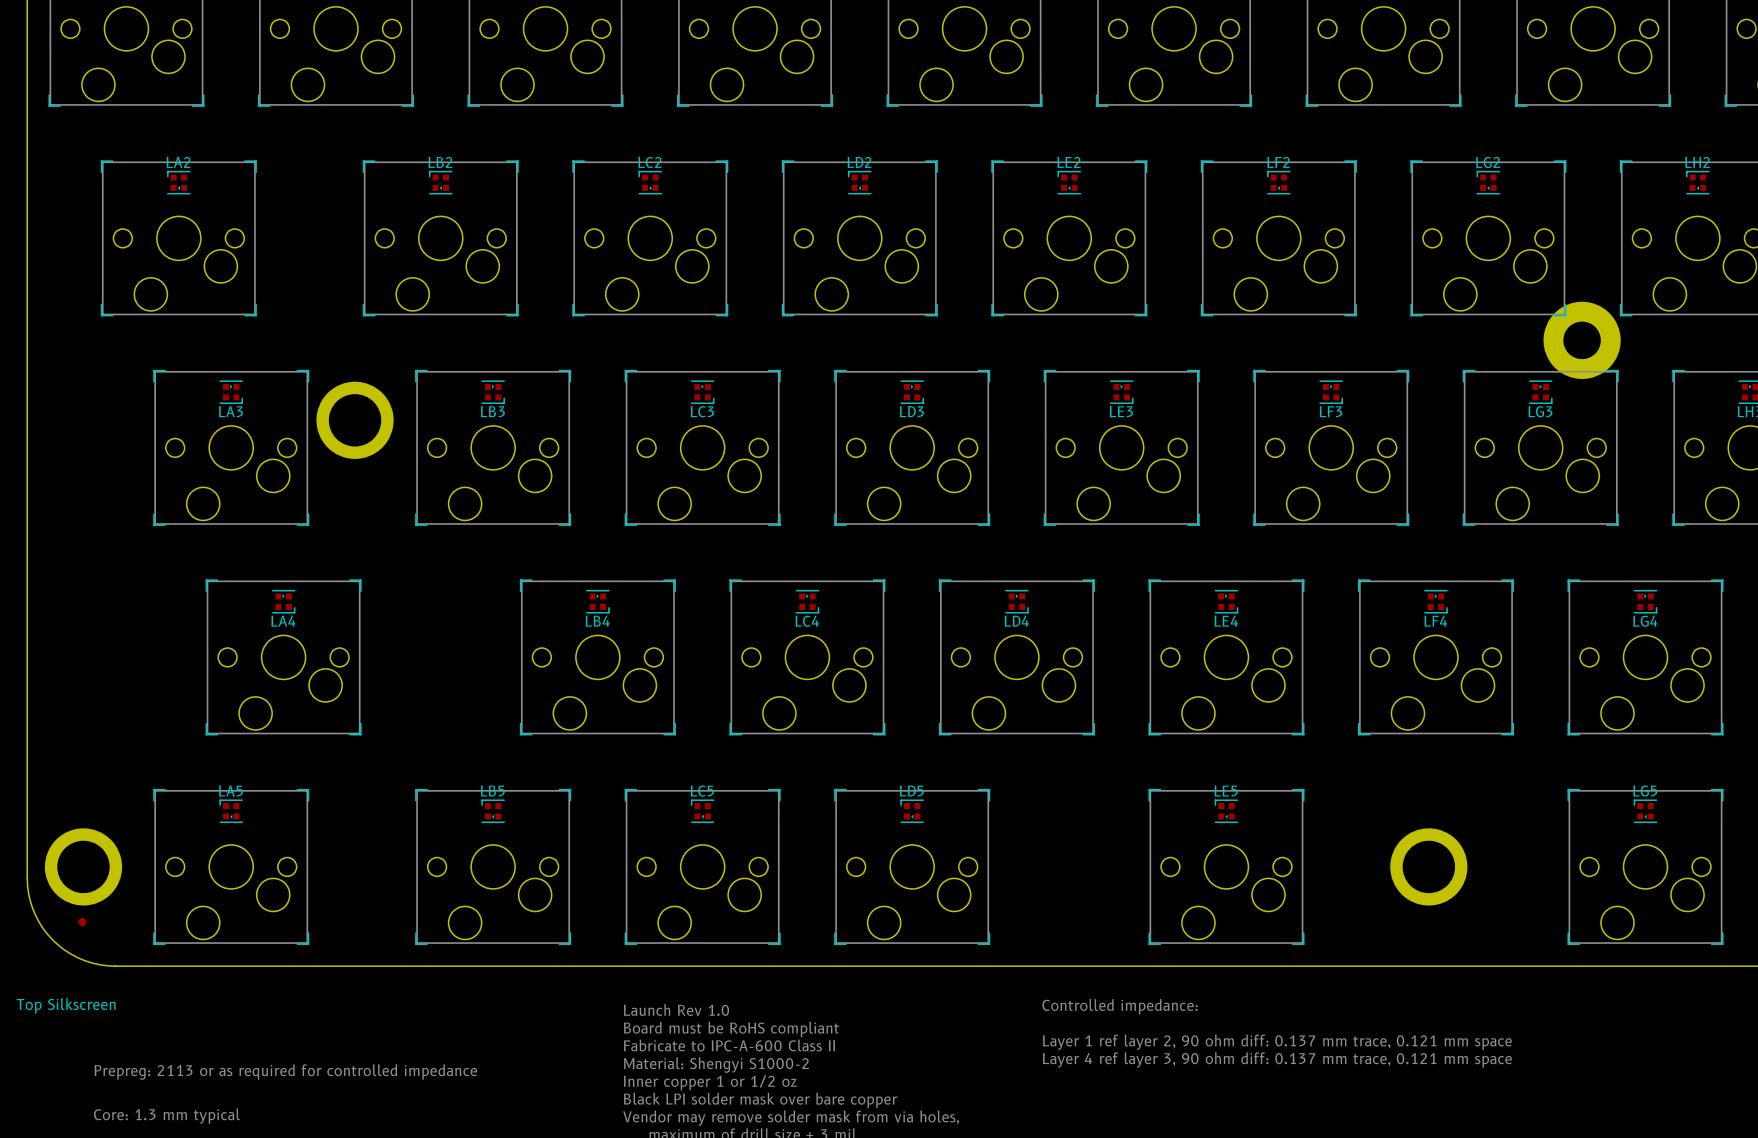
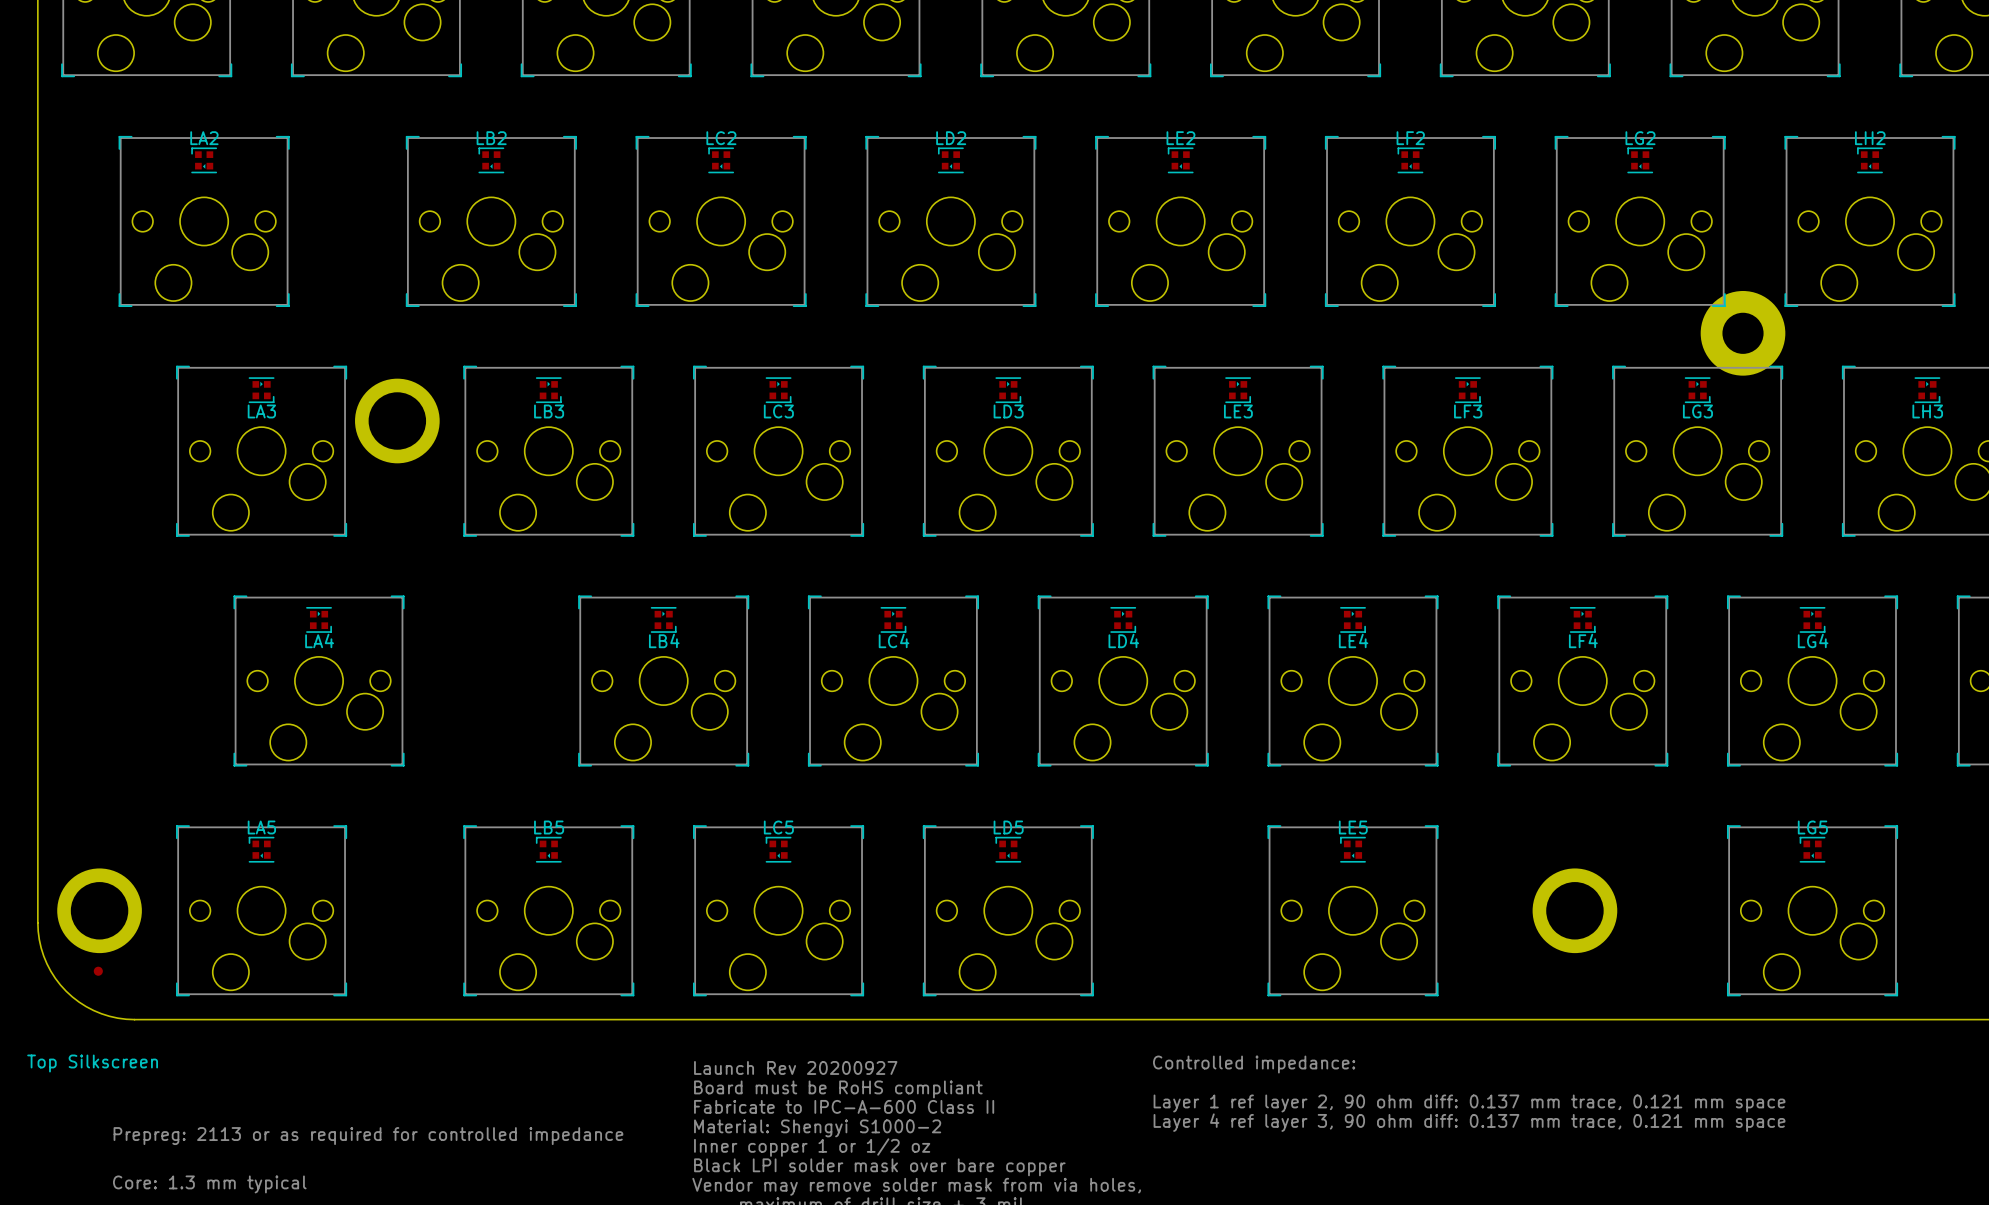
text: Launch Rev 1.0 (676, 1009) -> Launch Rev 20200927 (795, 1067)

